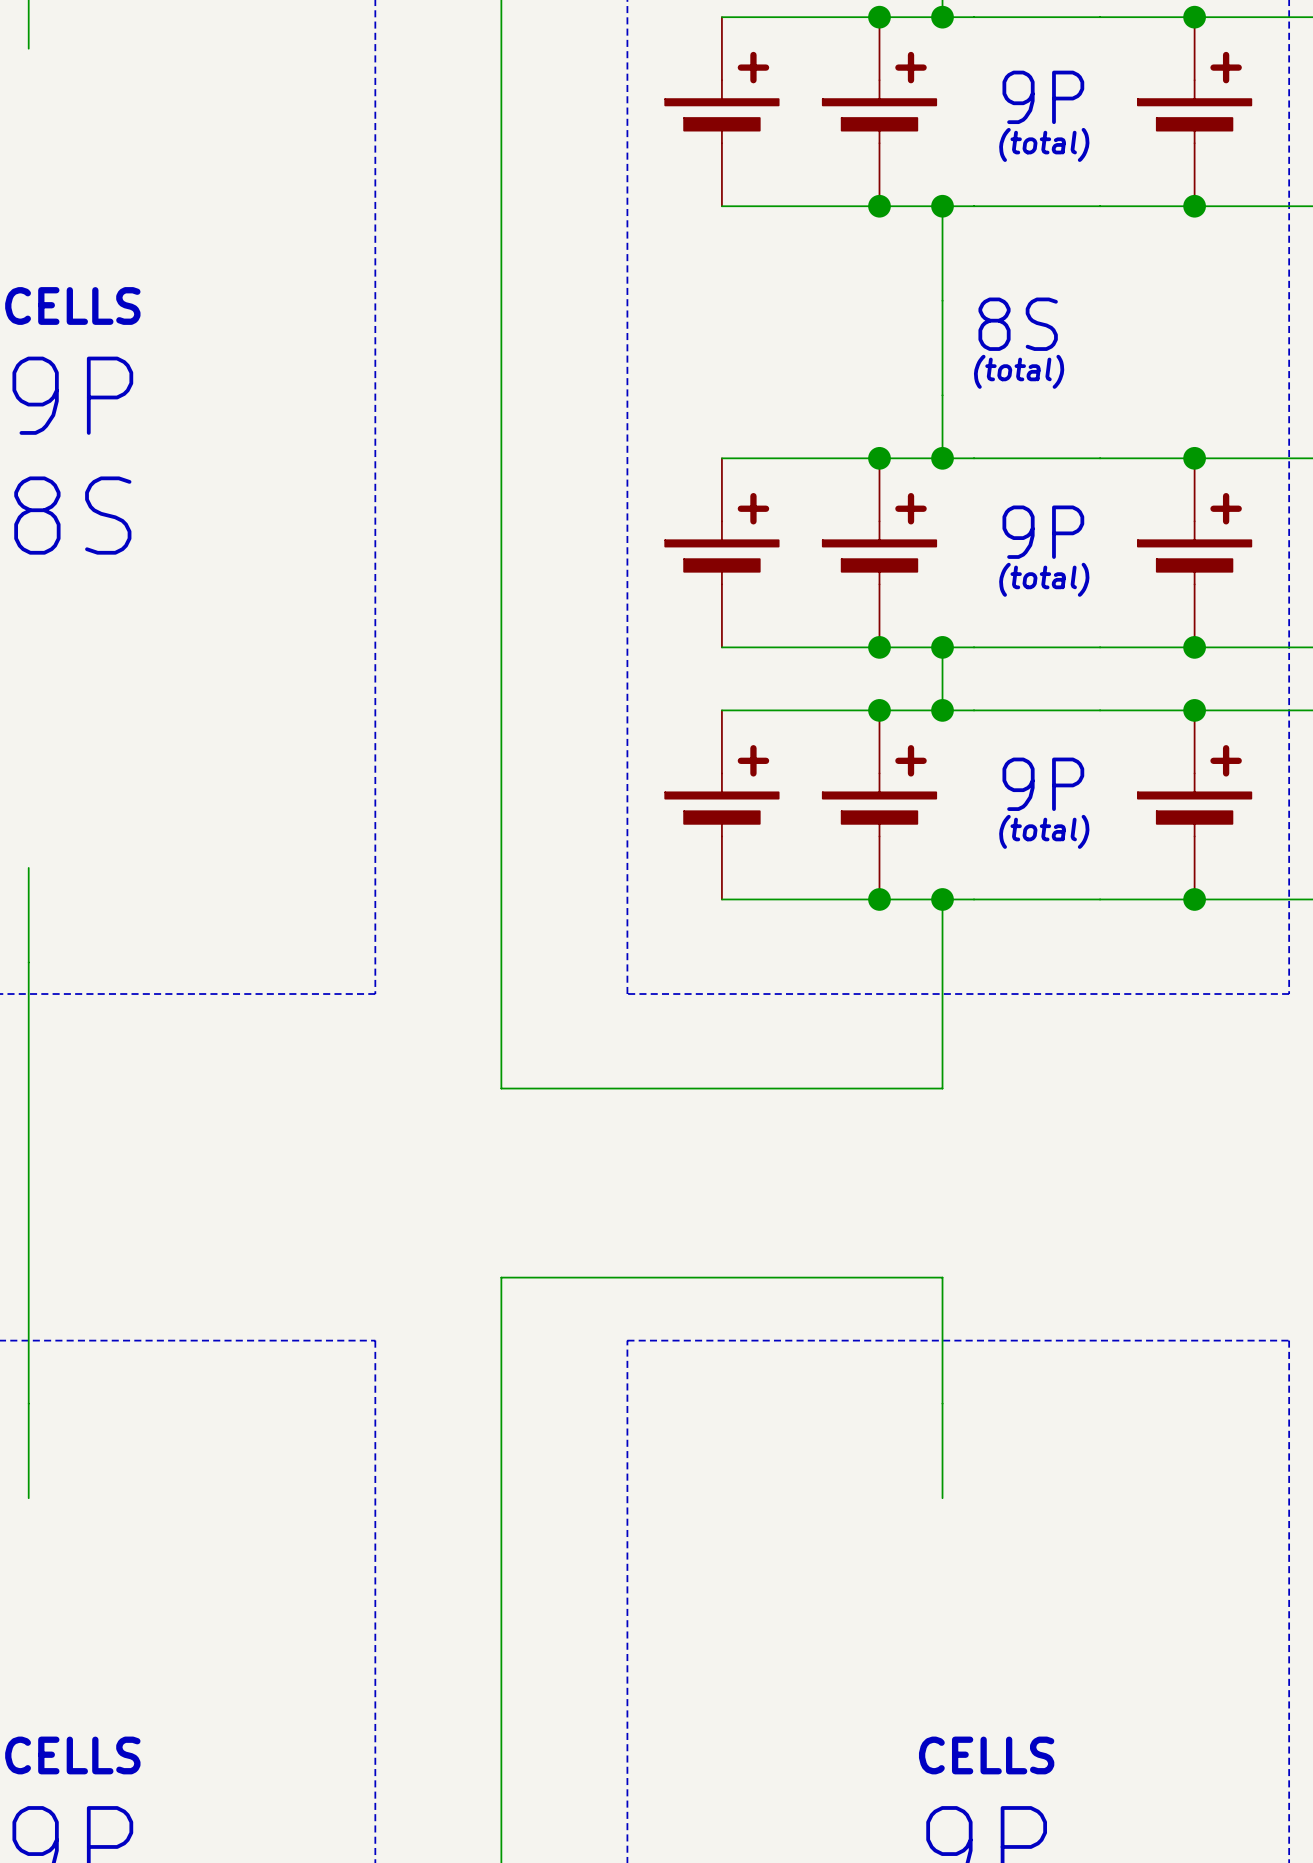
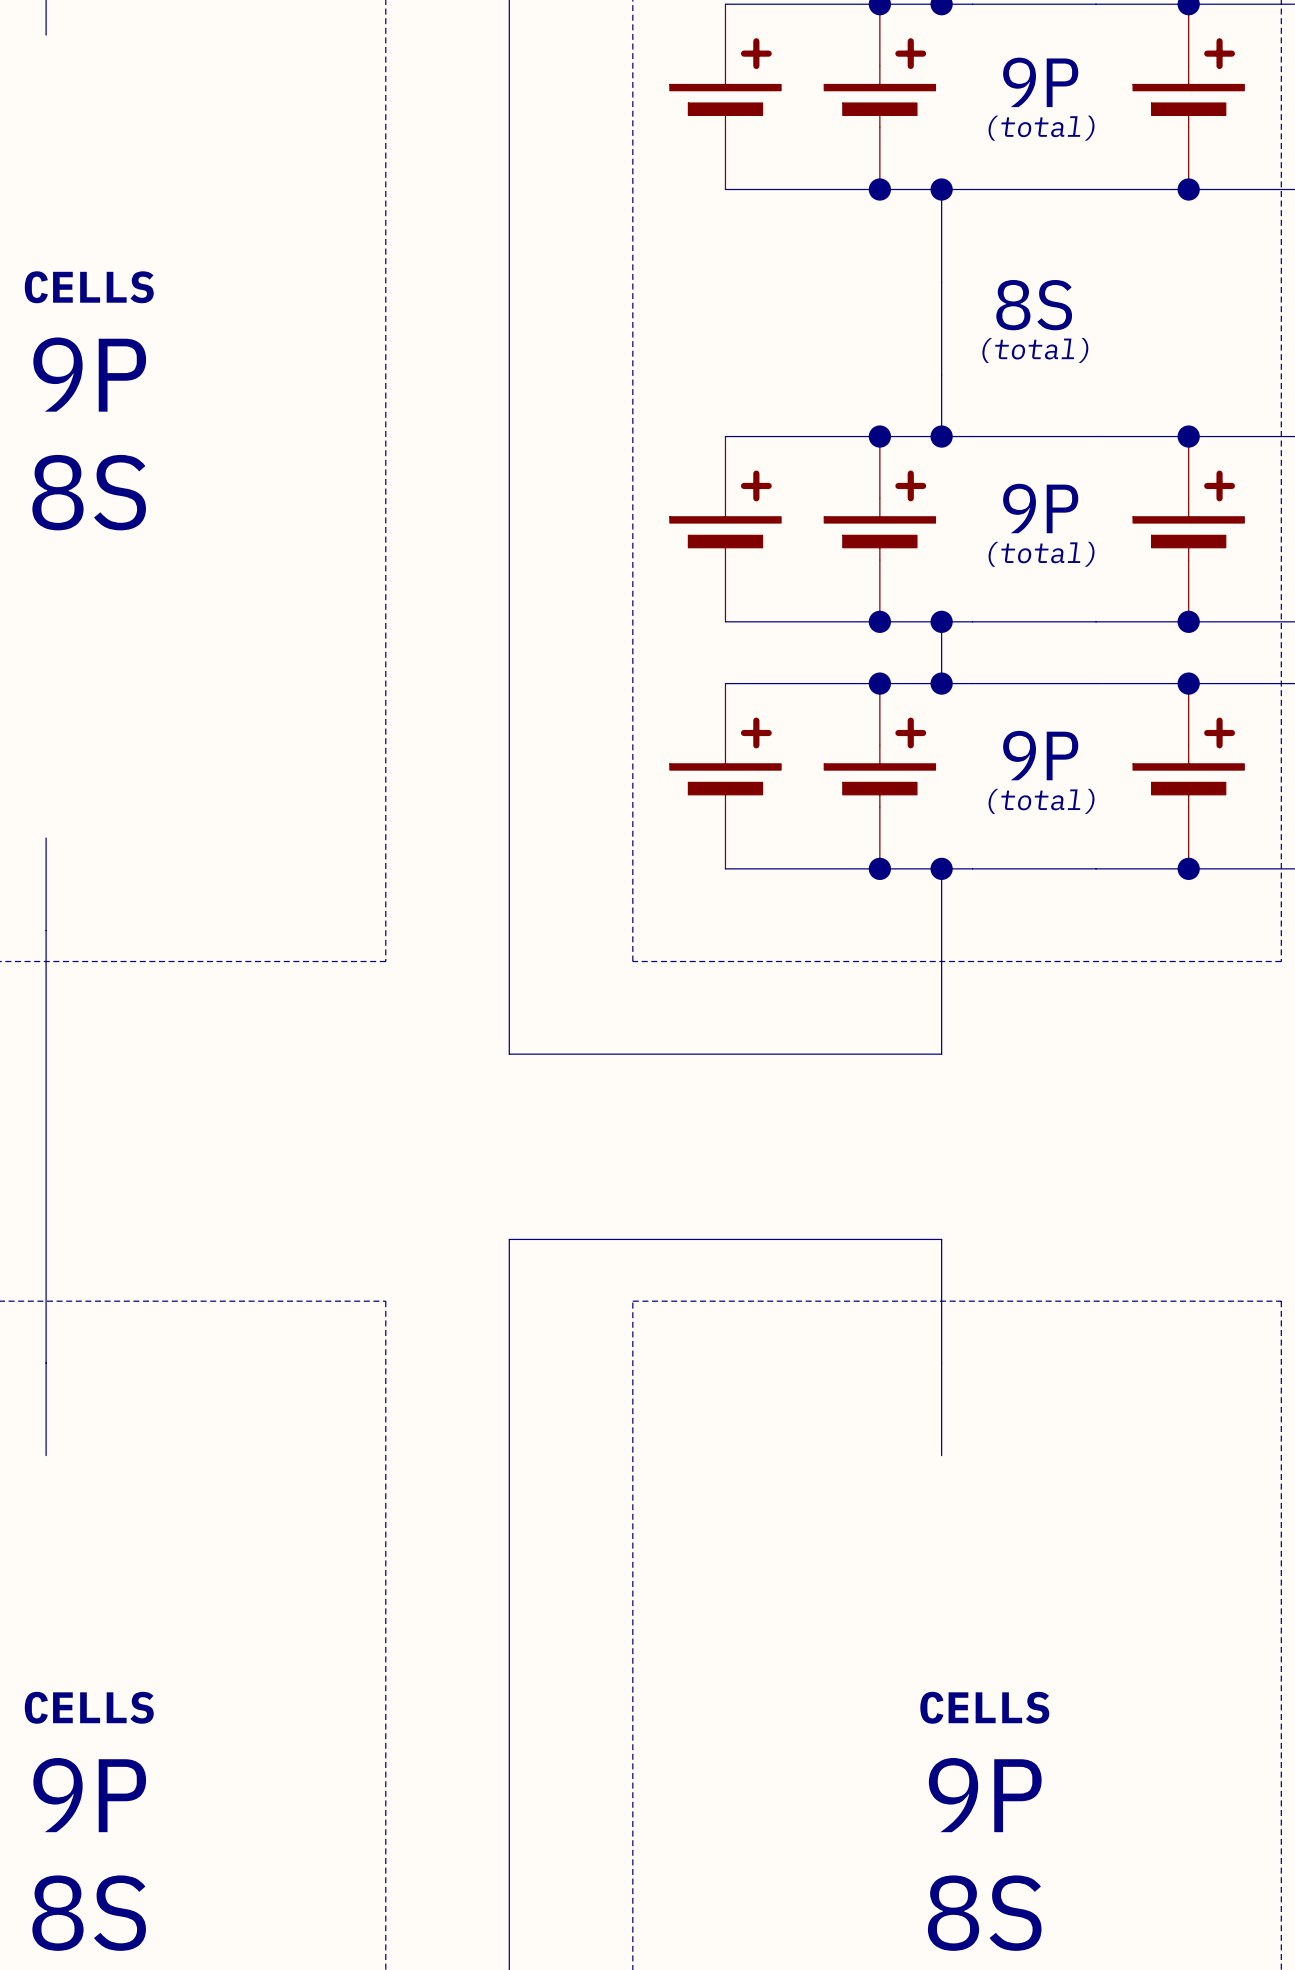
text position: 8S (1018, 324) -> 8S (1034, 305)
text position: (total) (1019, 371) -> (total) (1035, 350)

